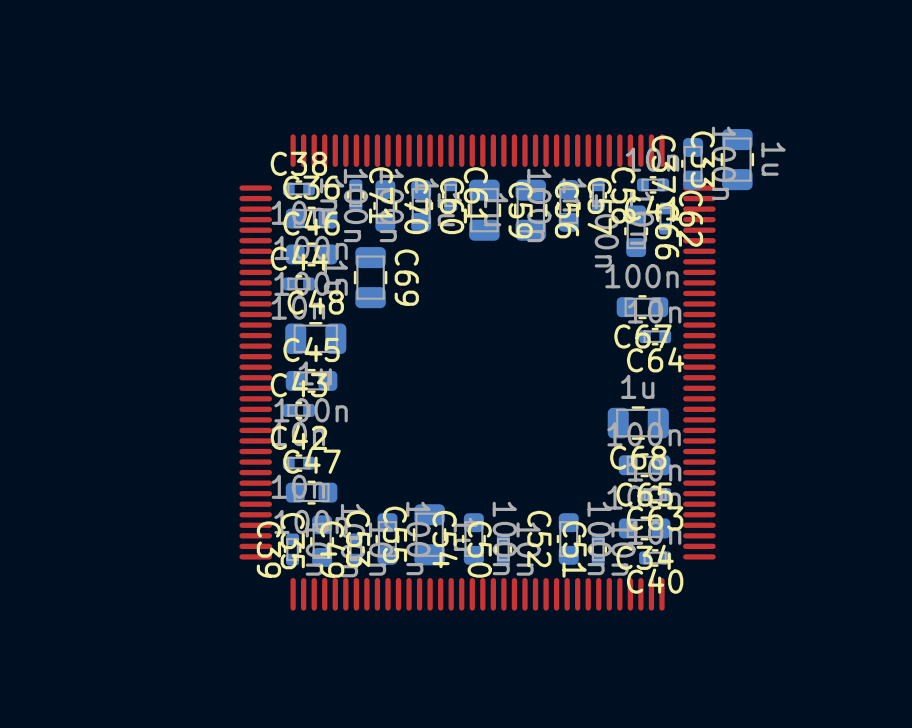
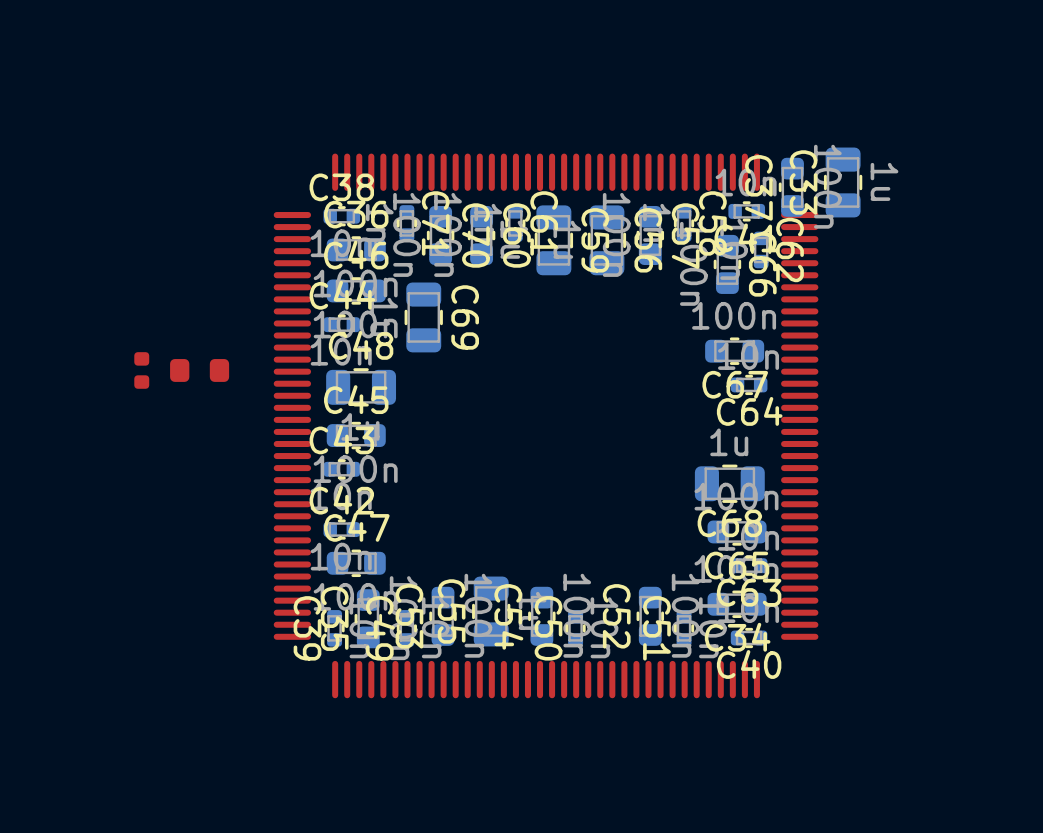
part: none -> (141, 370)
part: none -> (199, 370)

